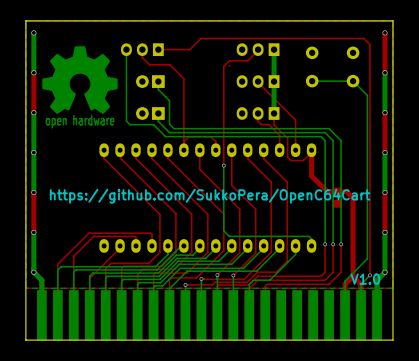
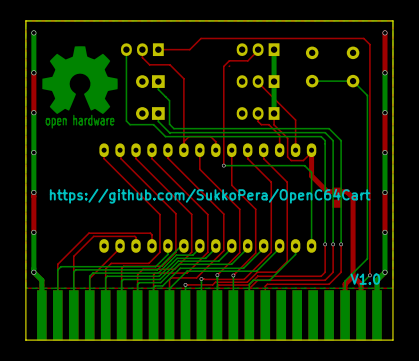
bottom track: (223, 165) (223, 230) (229, 236) (309, 236) (311, 238) -> (223, 165) (304, 165) (311, 172) (311, 238)

